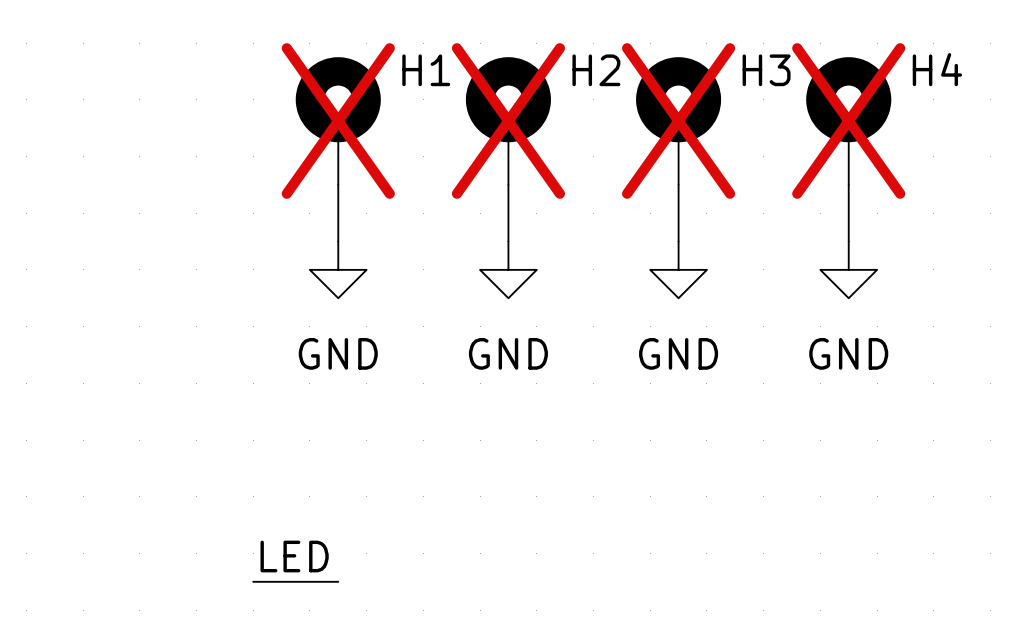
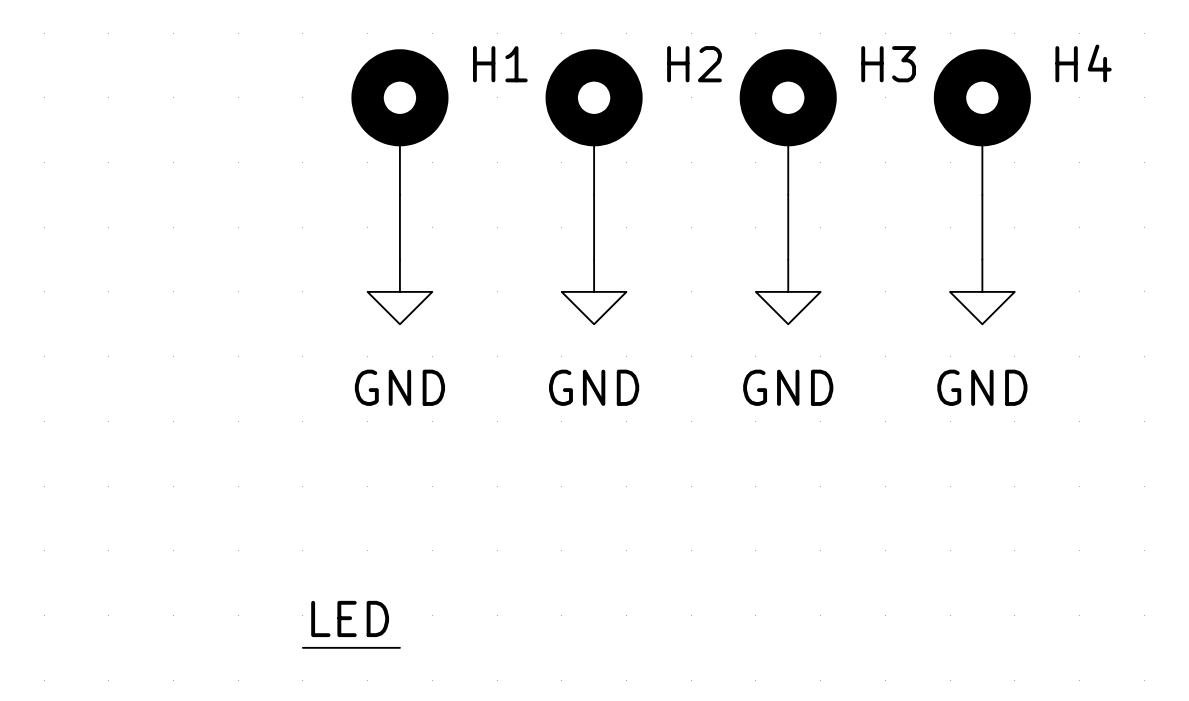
H1 do-not-place cross: (338, 120) -> none
H2 do-not-place cross: (508, 120) -> none
H3 do-not-place cross: (678, 120) -> none
H4 do-not-place cross: (848, 120) -> none

